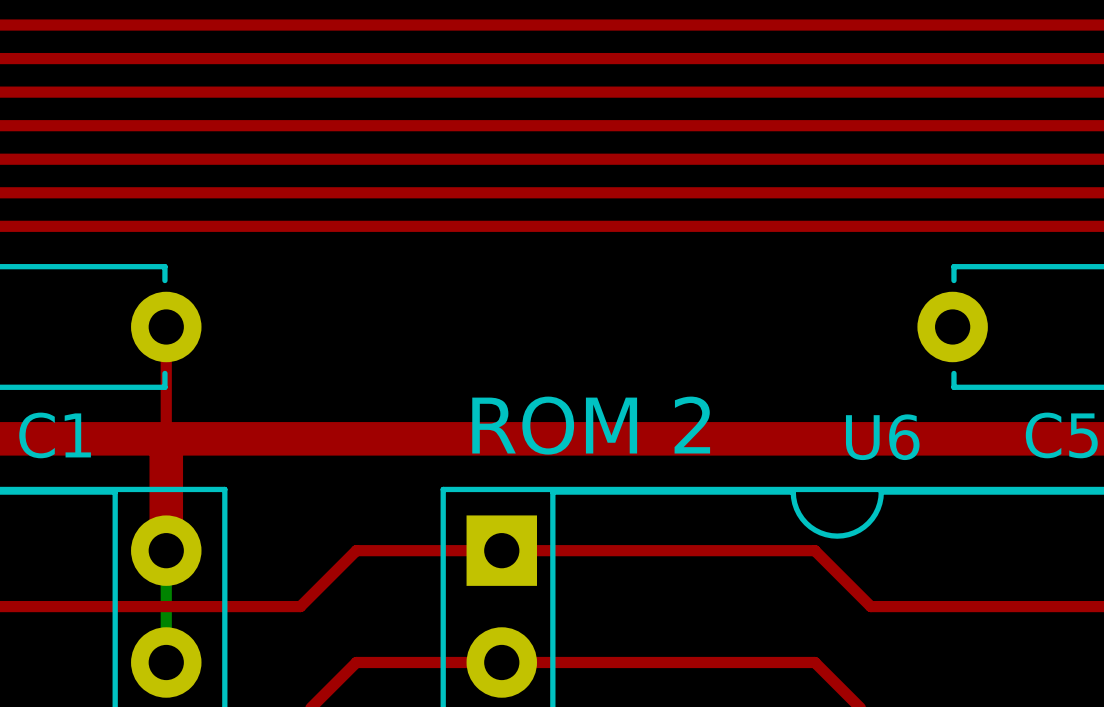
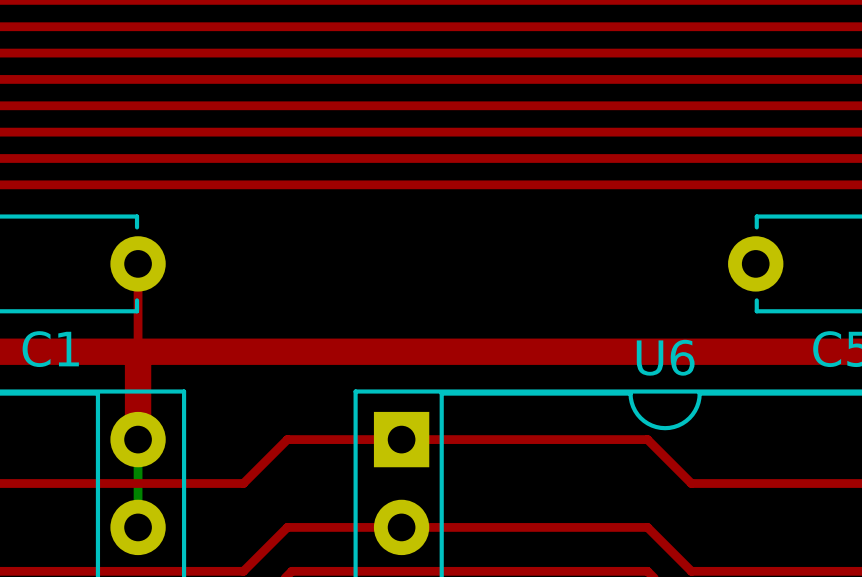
text: ROM 2 (591, 425) -> none
U6 name position: U6 (882, 437) -> U6 (665, 357)

